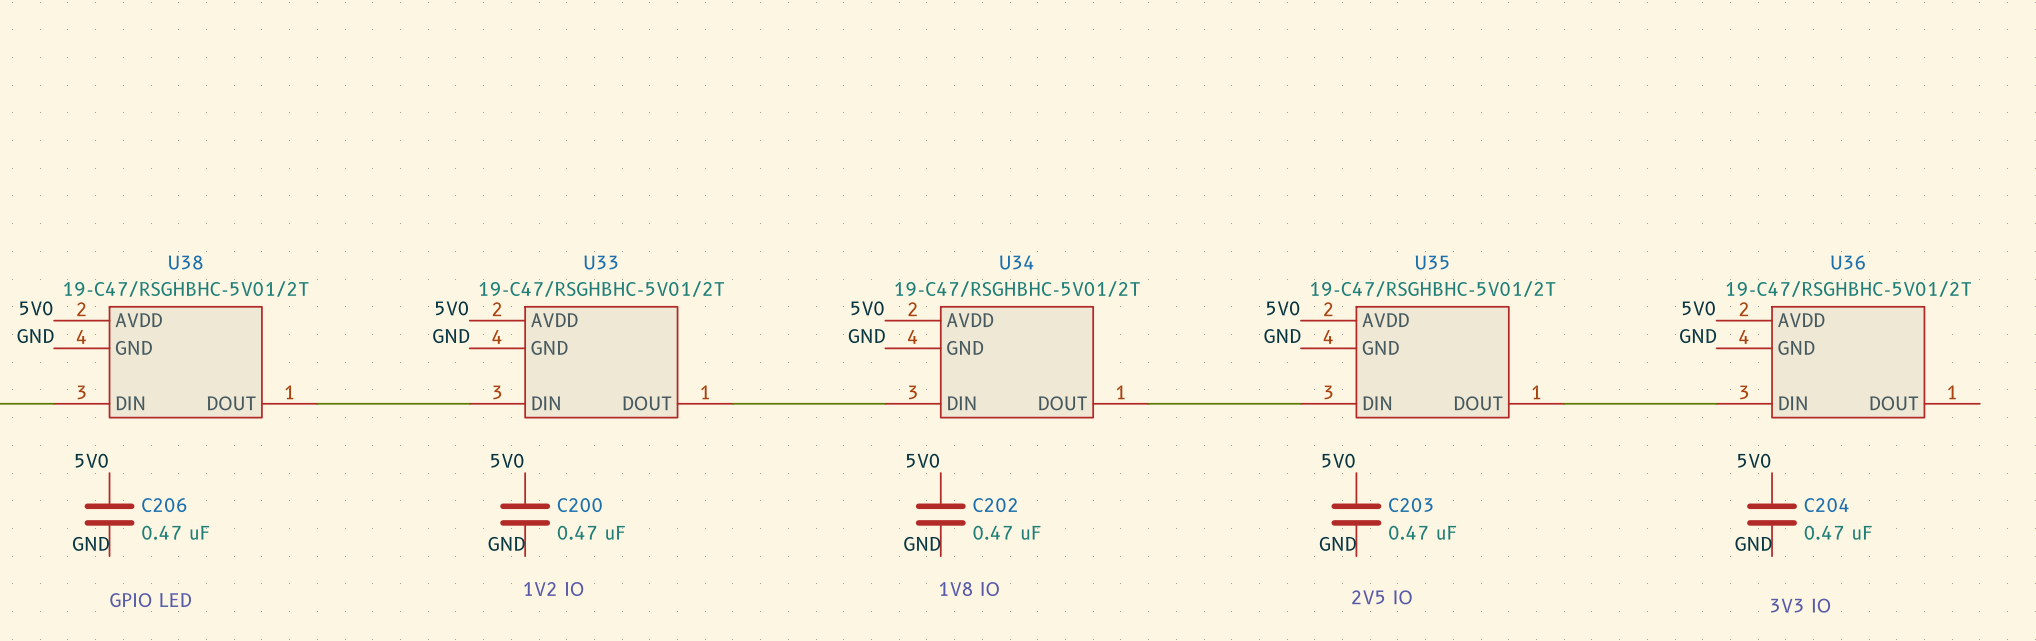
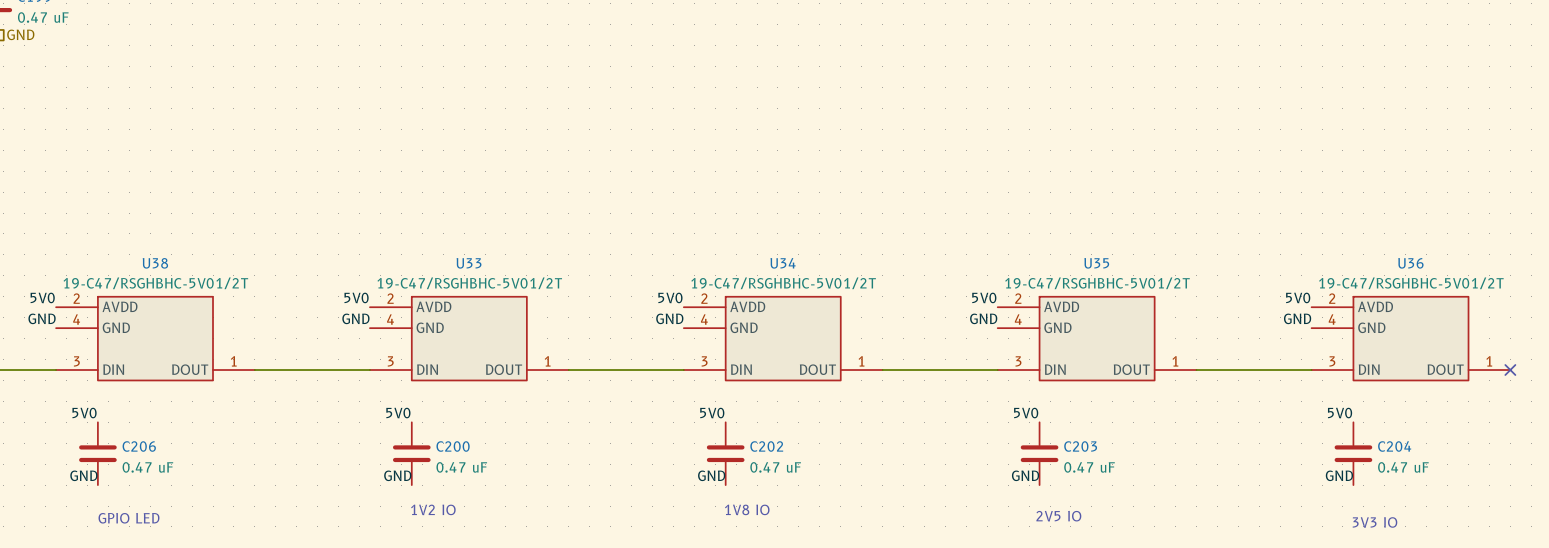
no-connect mark: none -> (1510, 370)

